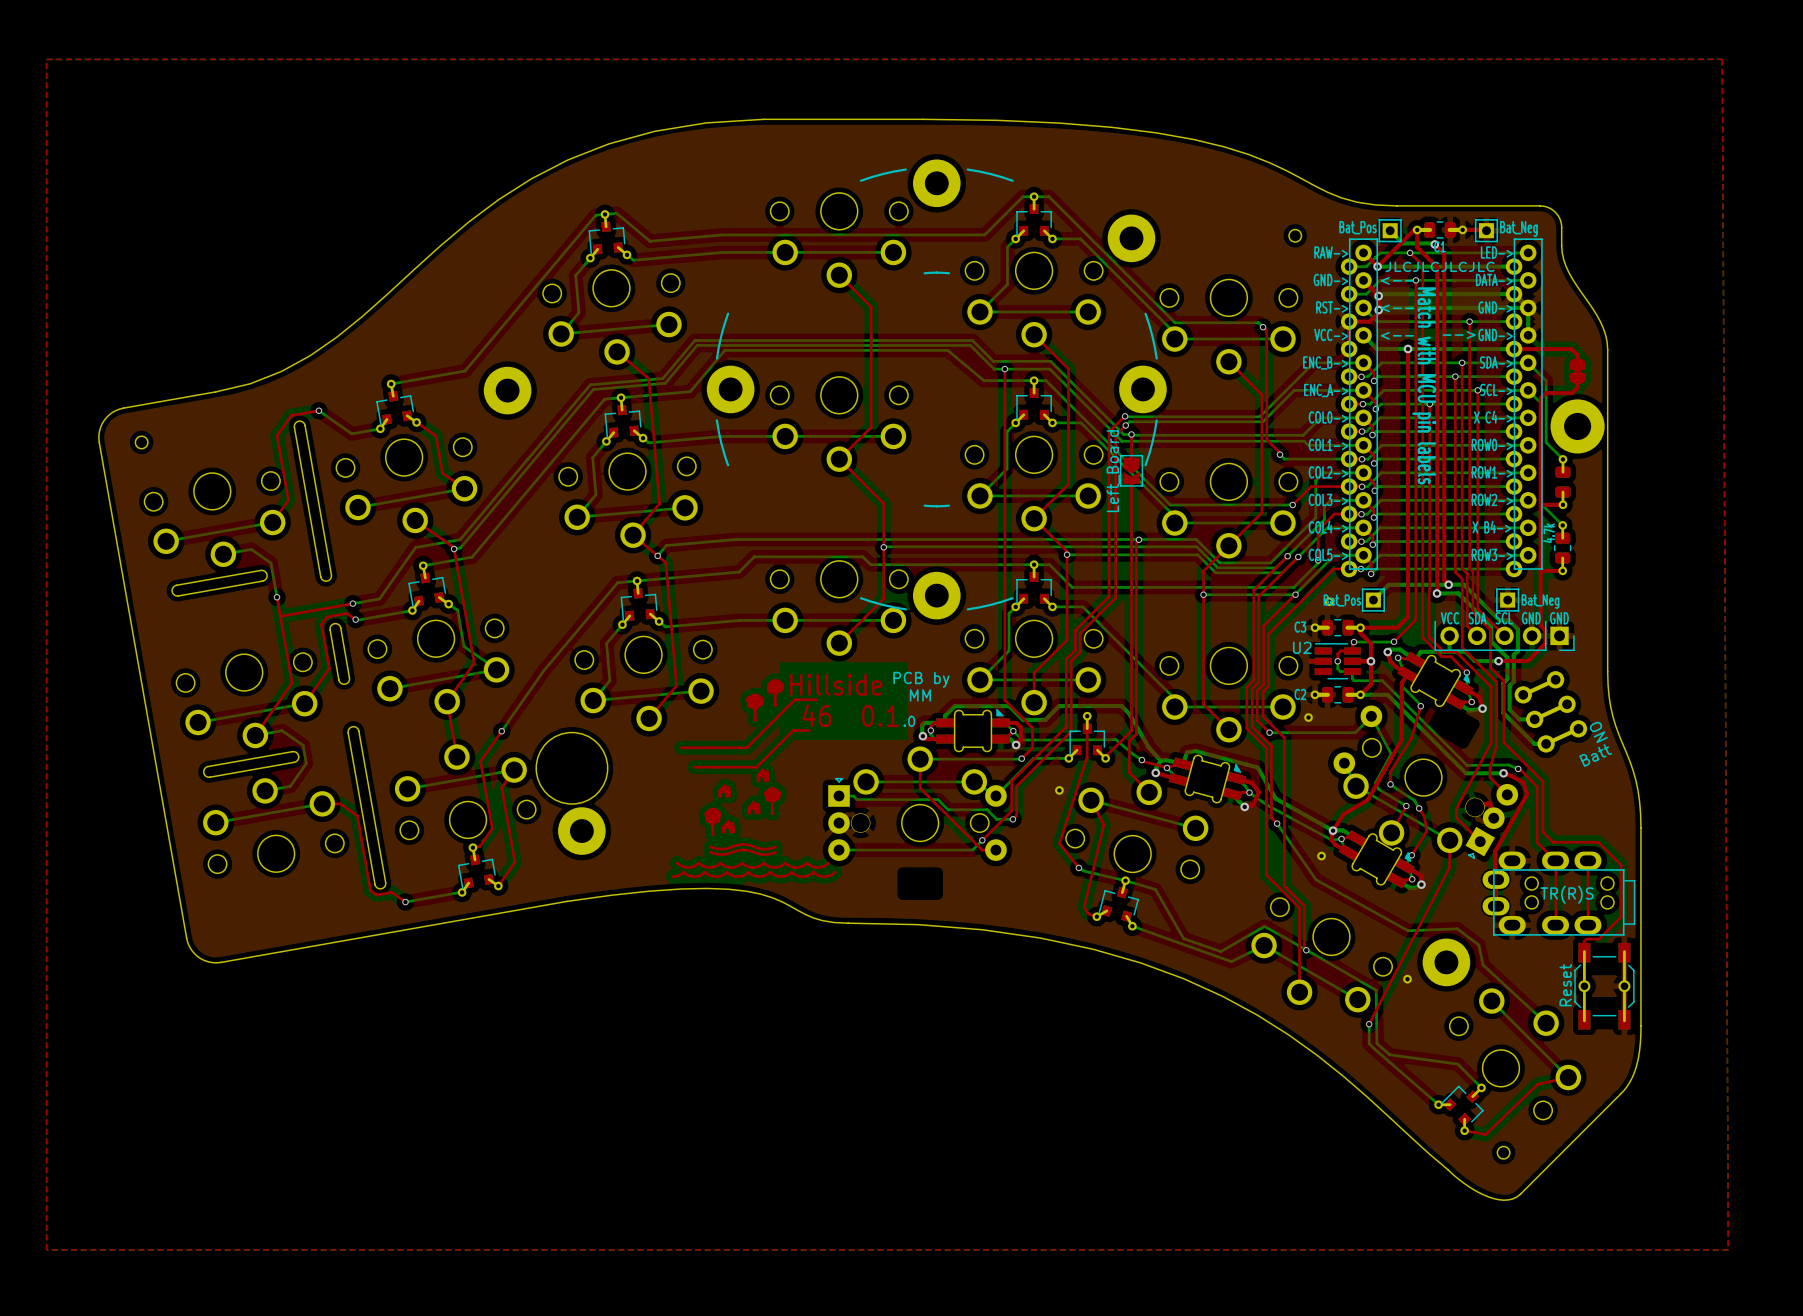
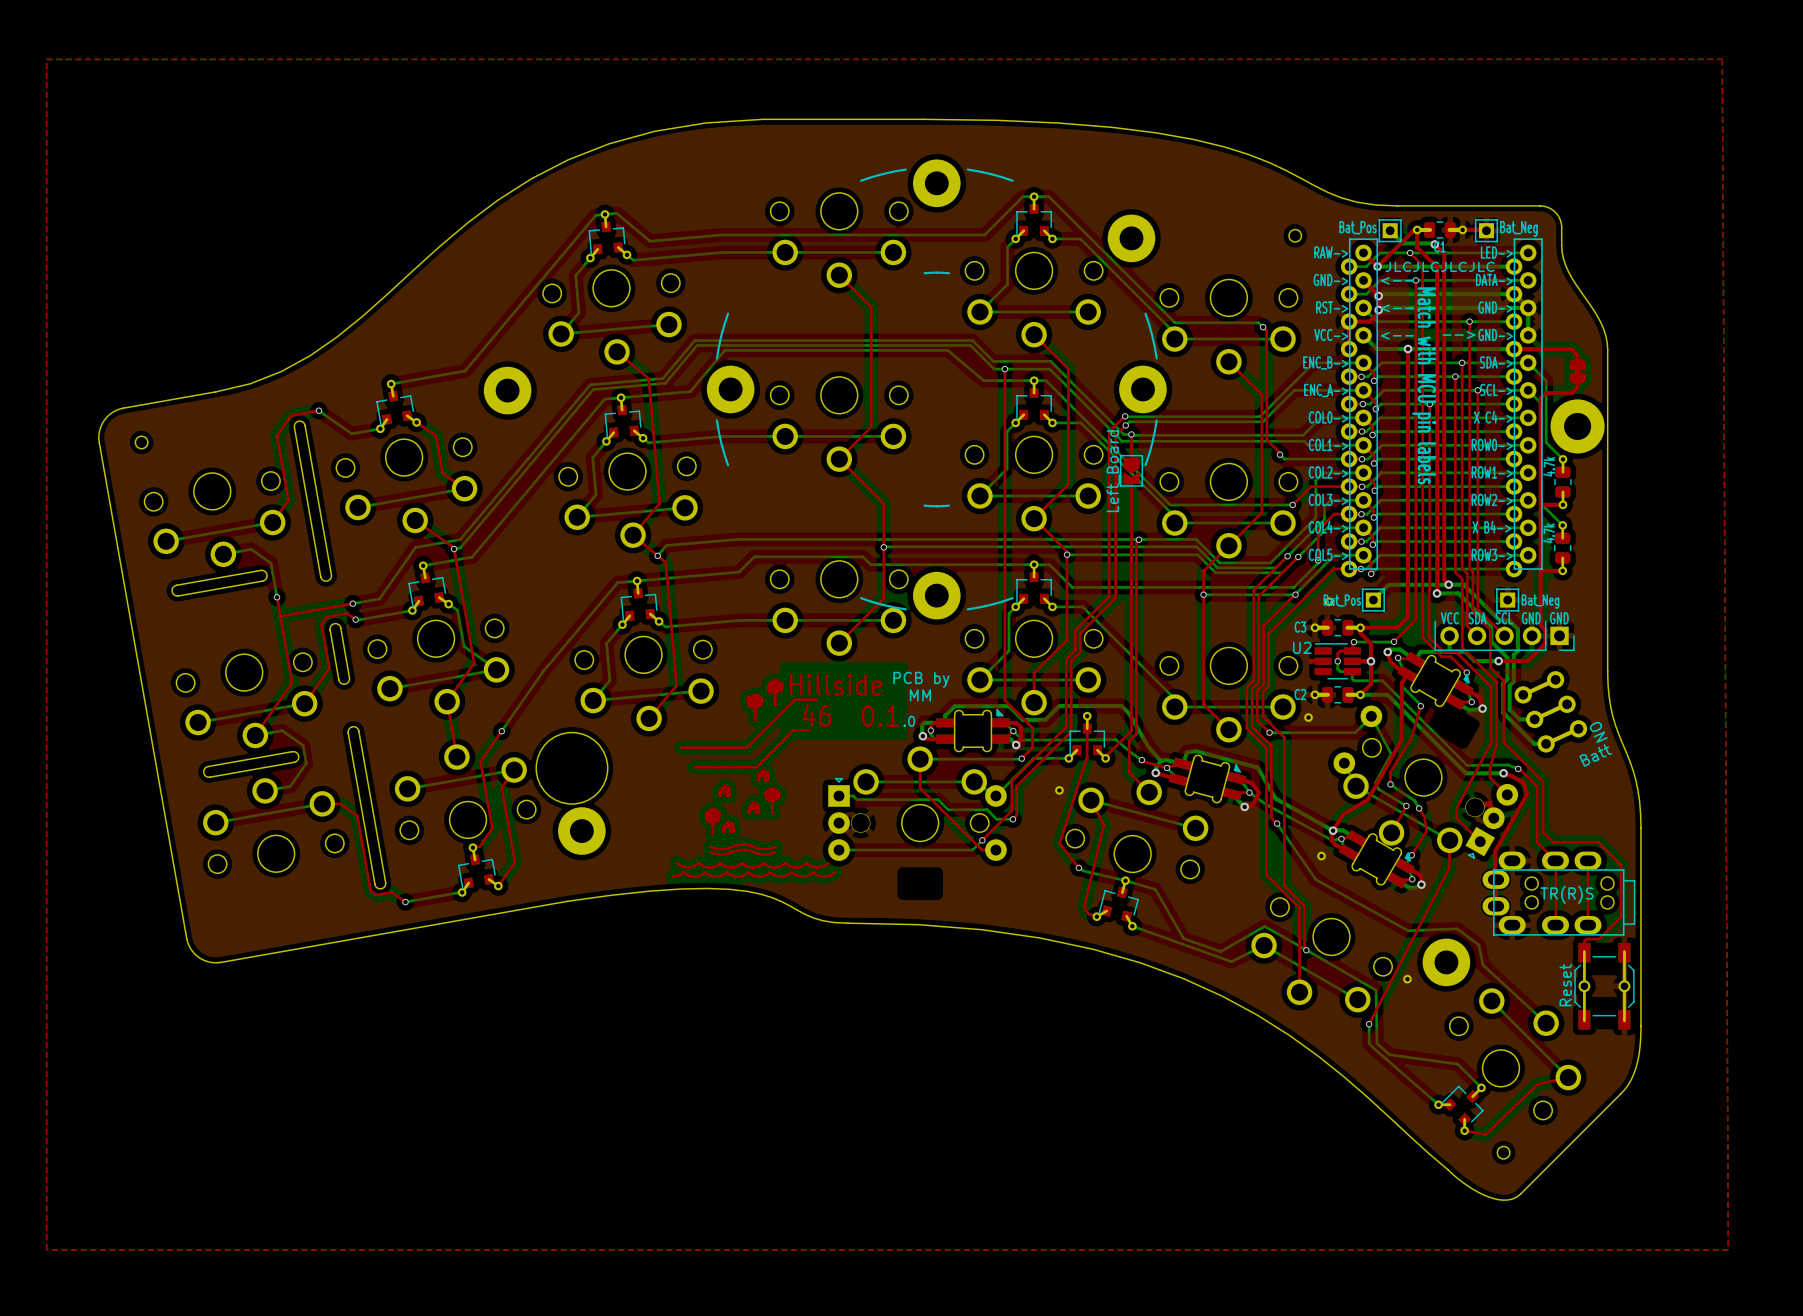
part side: bottom (1562, 482) -> top (1562, 482)

